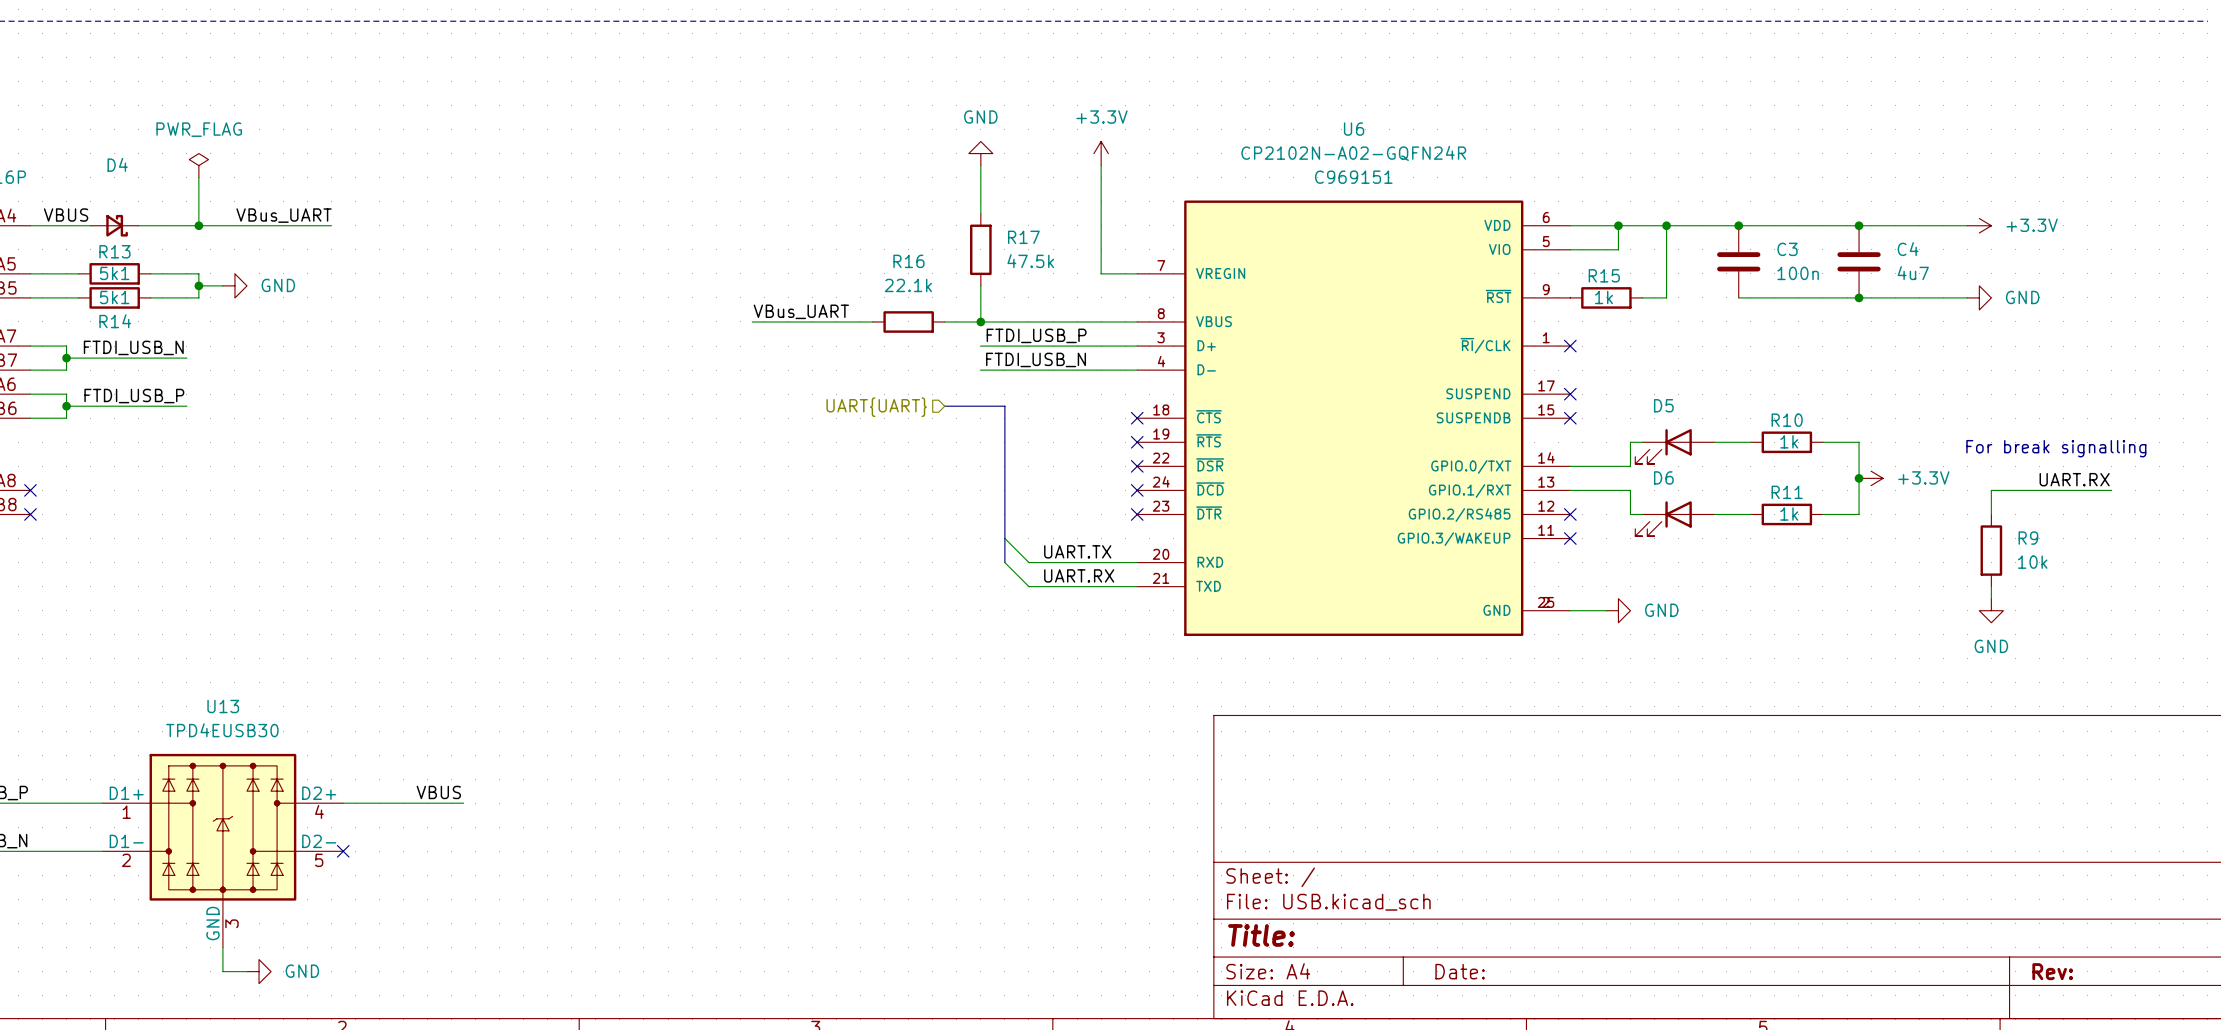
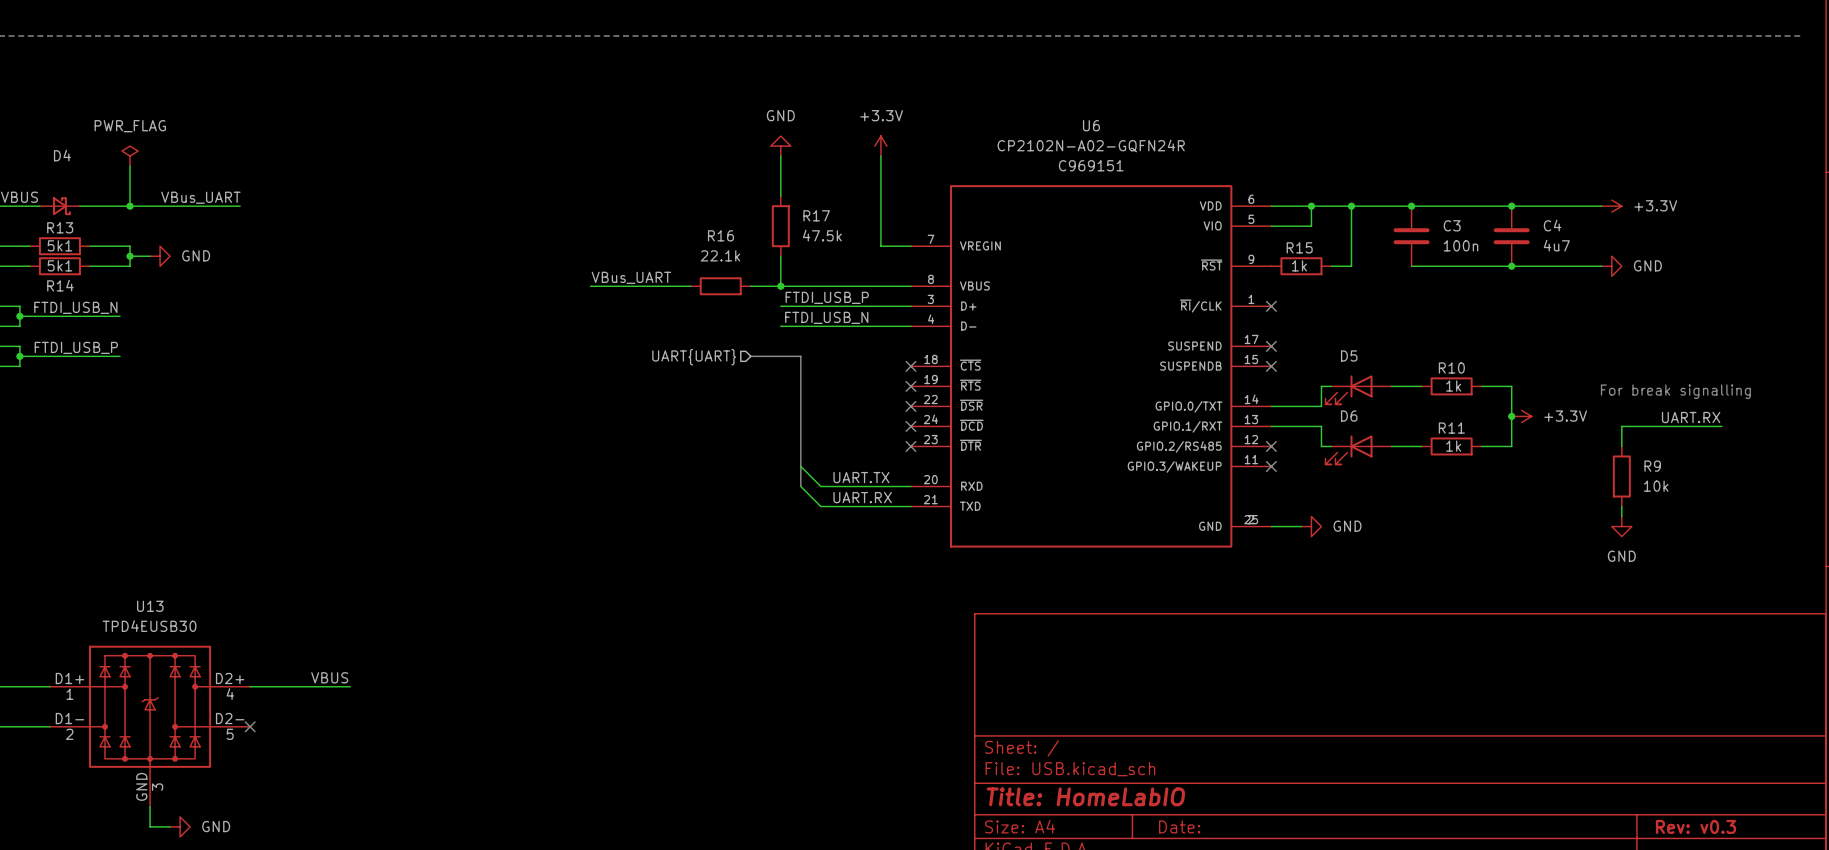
title block: Title: (1261, 935) -> Title: HomeLabIO (1085, 796)
title block: Rev: (2052, 971) -> Rev: v0.3 (1695, 826)

